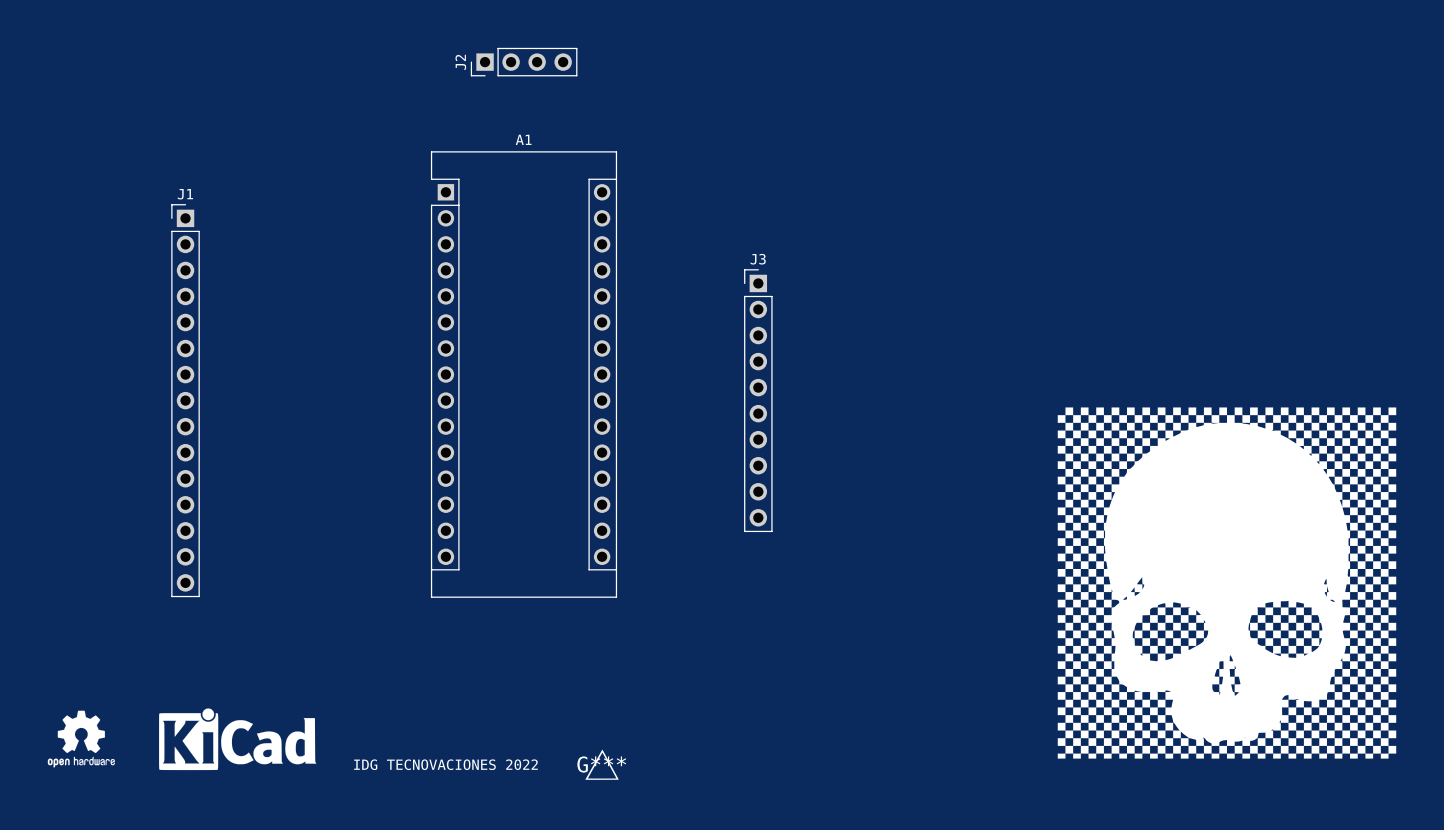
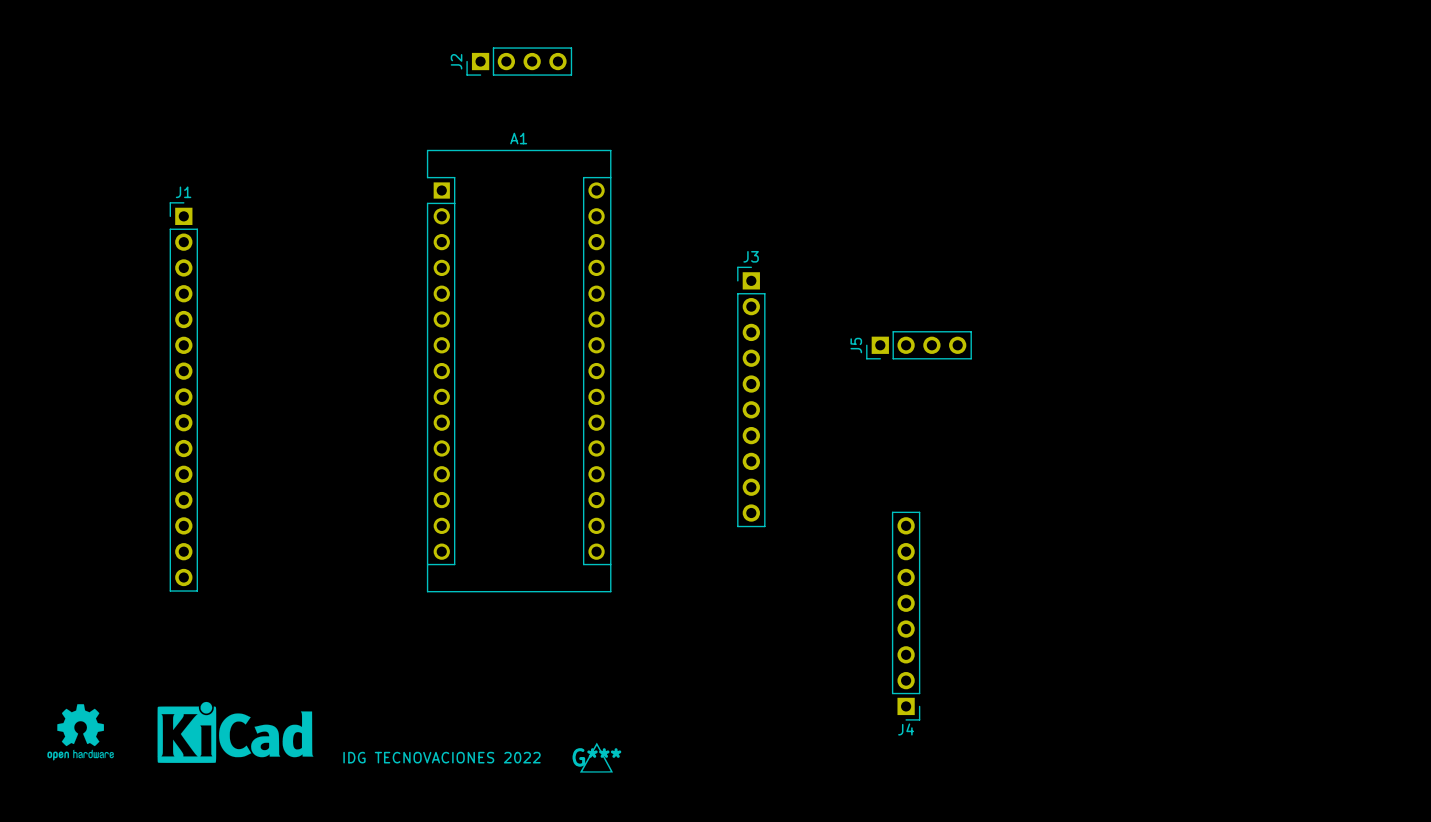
J5: none -> (919, 345)
part: (1226, 583) -> none
J4: none -> (906, 616)

